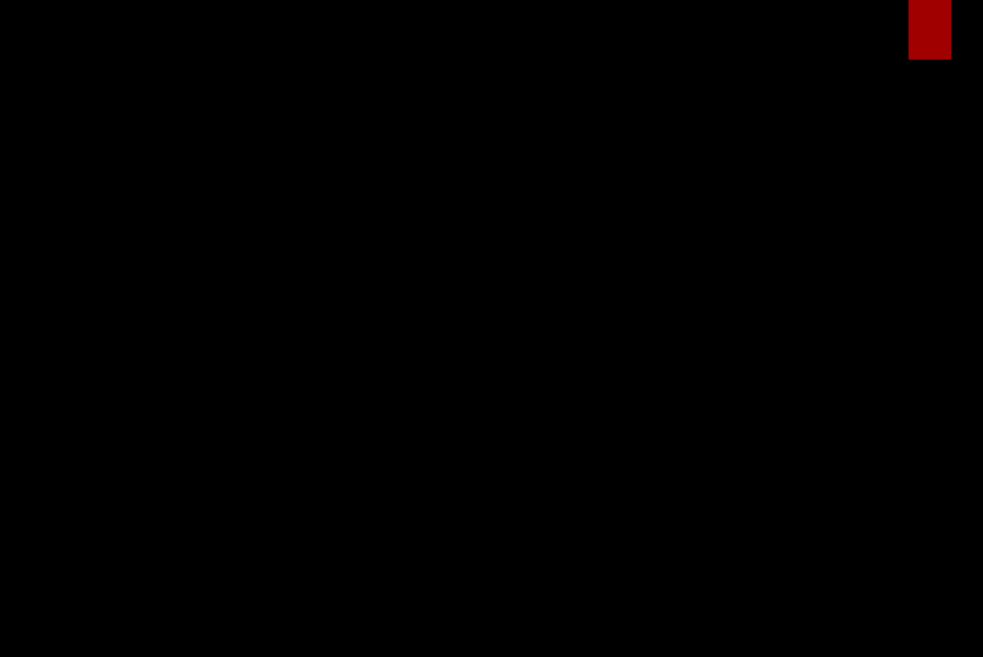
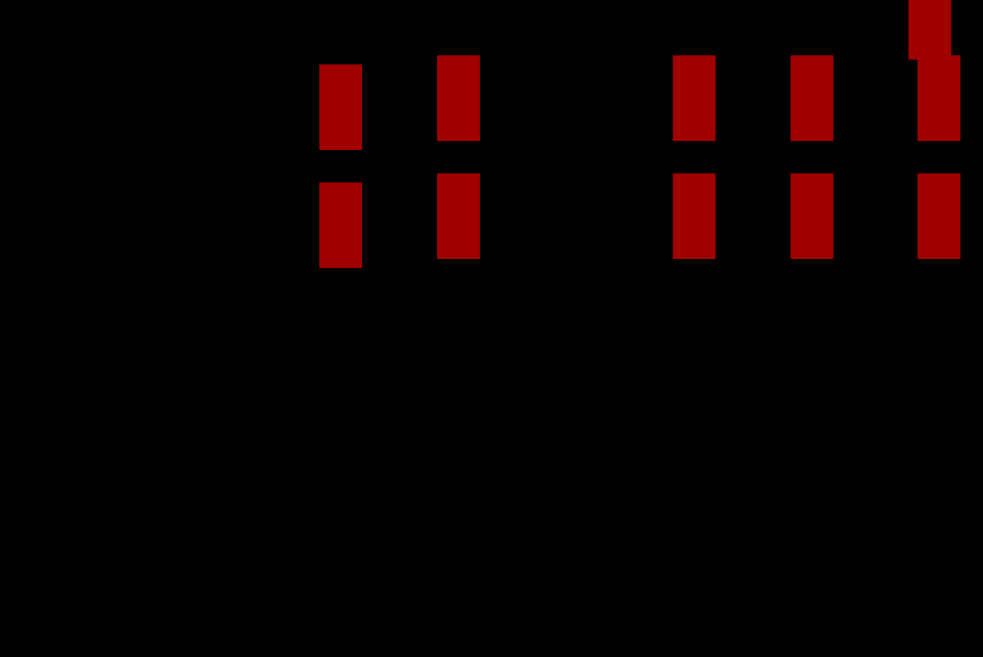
part: none -> (458, 157)
part: none -> (694, 157)
part: none -> (812, 157)
part: none -> (938, 157)
part: none -> (340, 166)

